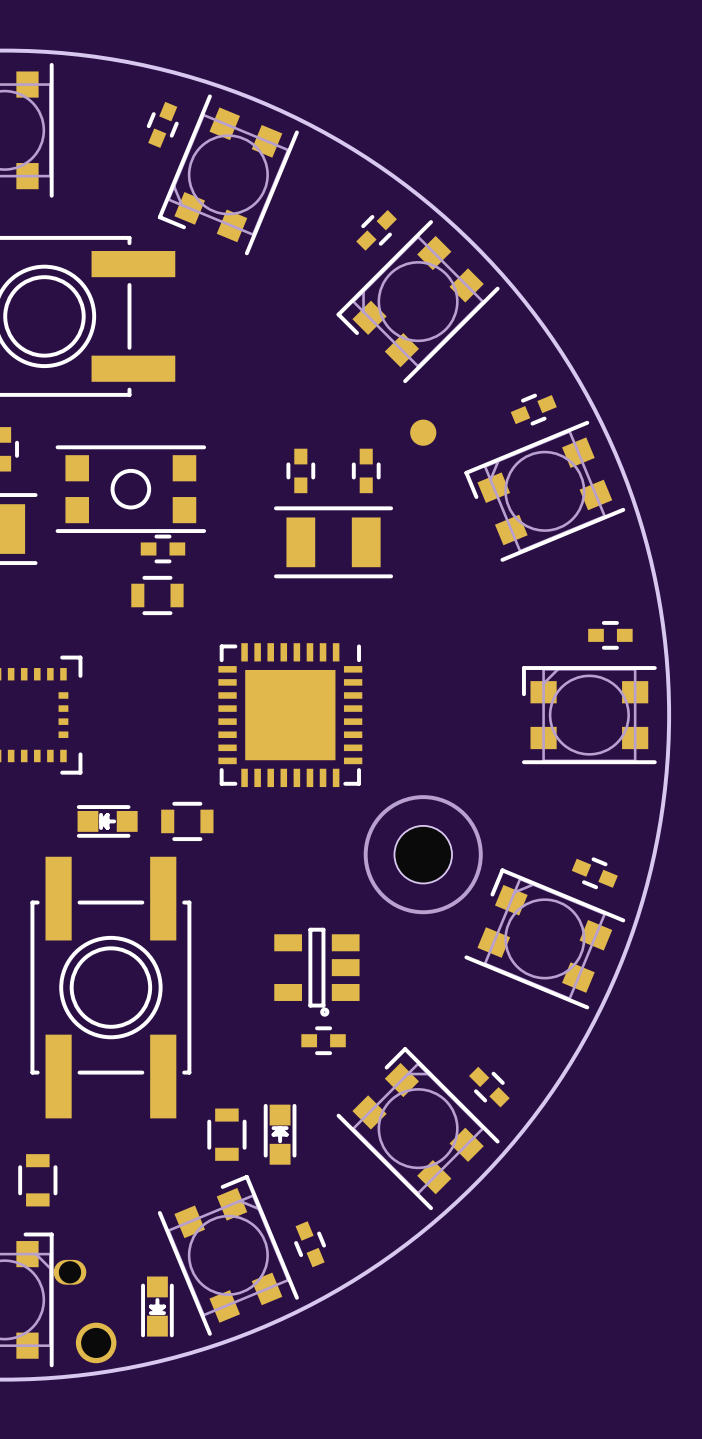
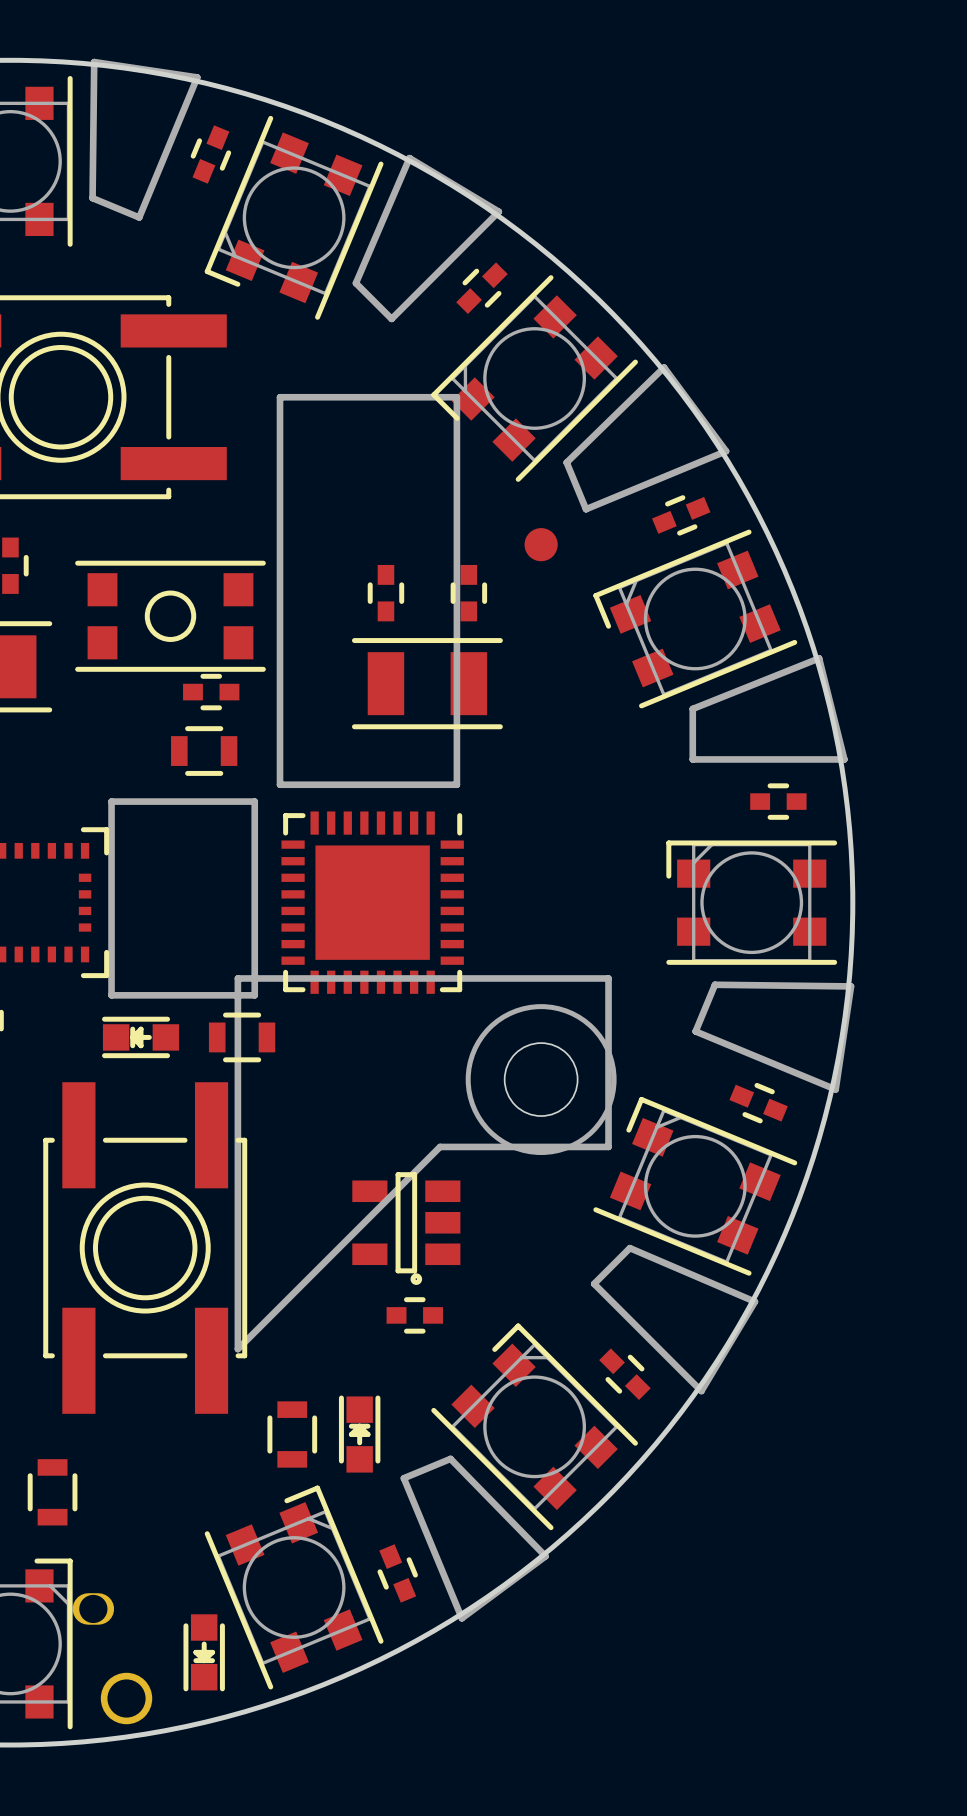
line: none -> (94, 62) (92, 198) (139, 217) (197, 77) (94, 62)
line: none -> (409, 158) (355, 283) (391, 318) (498, 211) (409, 158)
line: none -> (664, 367) (566, 462) (586, 509) (726, 451) (664, 367)
line: none -> (280, 397) (456, 397) (456, 784) (280, 784) (280, 397)
line: none -> (819, 658) (692, 708) (692, 759) (844, 759) (819, 658)
line: none -> (111, 801) (254, 801) (254, 995) (111, 995) (111, 801)
line: none -> (237, 978) (237, 1349) (440, 1146) (608, 1146) (608, 978) (237, 978)
line: none -> (714, 984) (695, 1031) (835, 1089) (851, 986) (714, 984)
line: none -> (629, 1248) (594, 1283) (701, 1391) (754, 1301) (629, 1248)
line: none -> (450, 1458) (403, 1478) (461, 1618) (545, 1556) (450, 1458)

